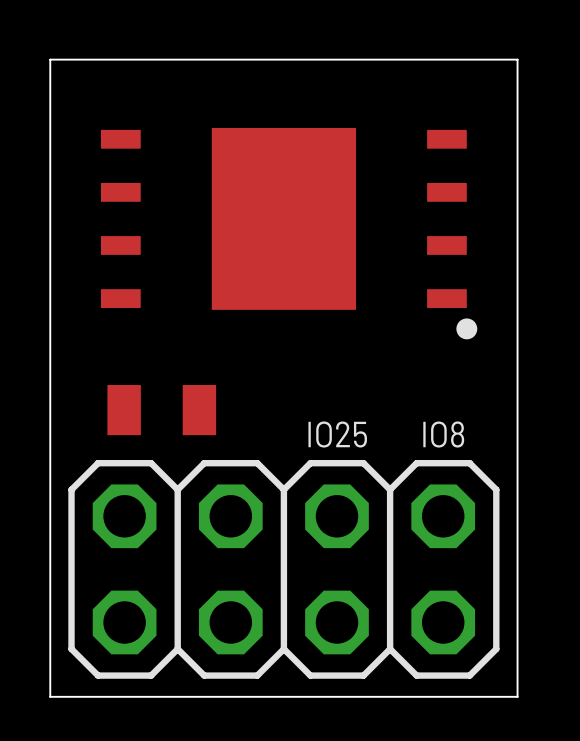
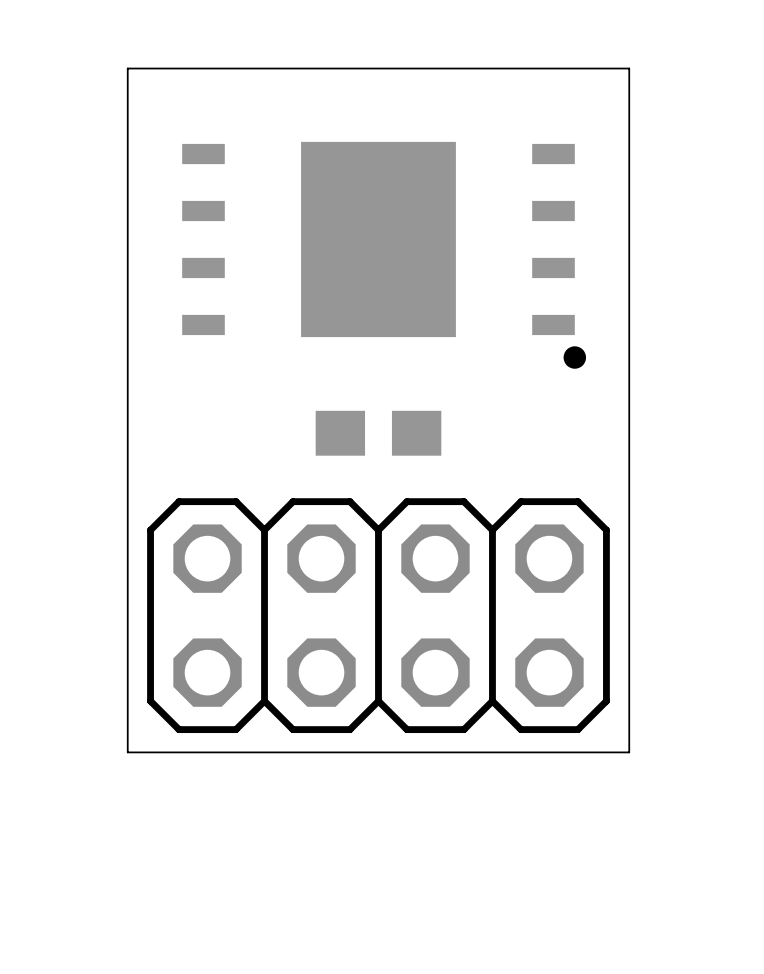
part: none -> (378, 433)
part: (161, 410) -> none
text: IO25 (337, 434) -> none
text: IO8 (443, 434) -> none

